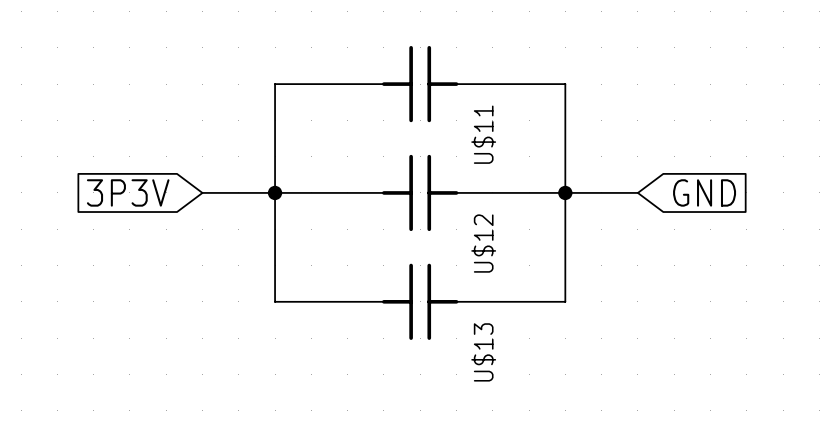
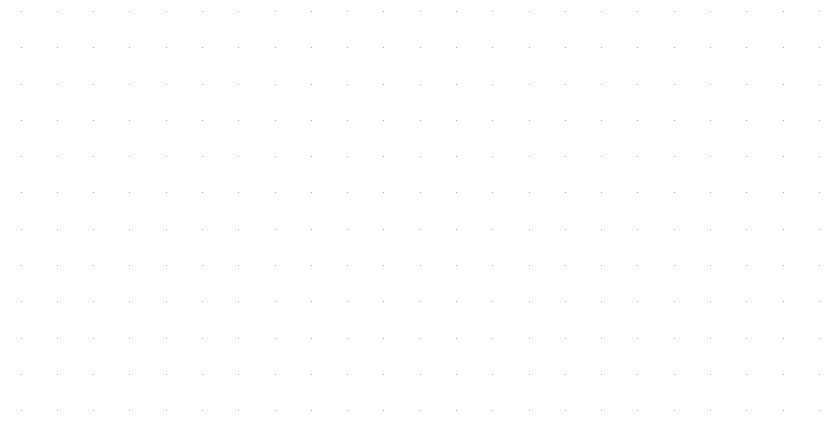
wire: (383, 84) (275, 84) (275, 301) (383, 301) -> none
U$11: (420, 84) -> none
wire: (456, 84) (565, 84) (565, 301) (456, 301) -> none
global label: 3P3V (128, 192) -> none
wire: (202, 192) (383, 192) -> none
junction: (275, 192) -> none
U$12: (420, 192) -> none
wire: (456, 192) (637, 192) -> none
junction: (565, 192) -> none
global label: GND (704, 192) -> none
U$13: (420, 301) -> none

